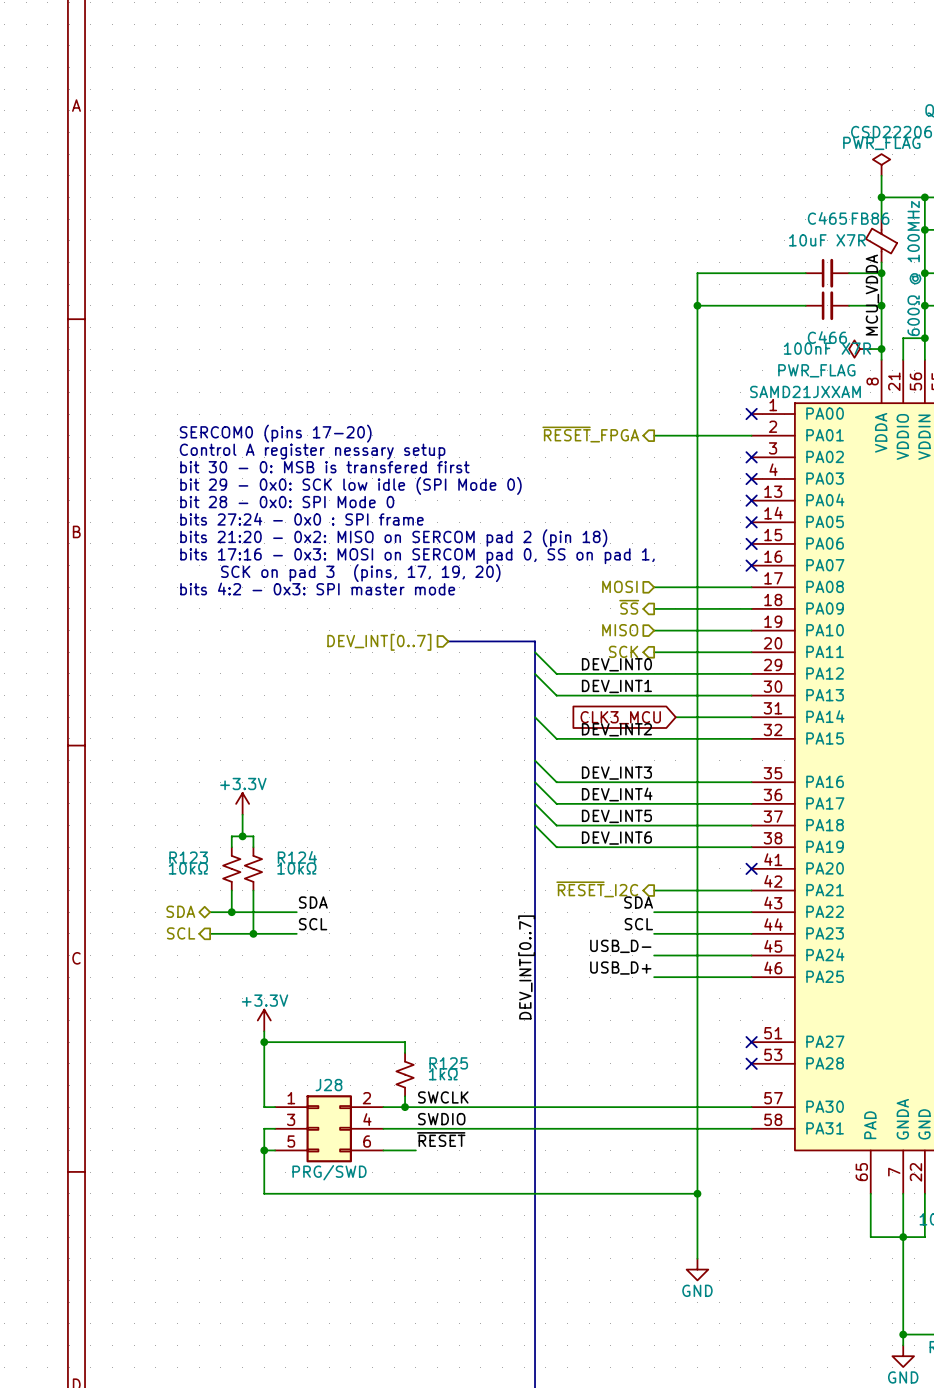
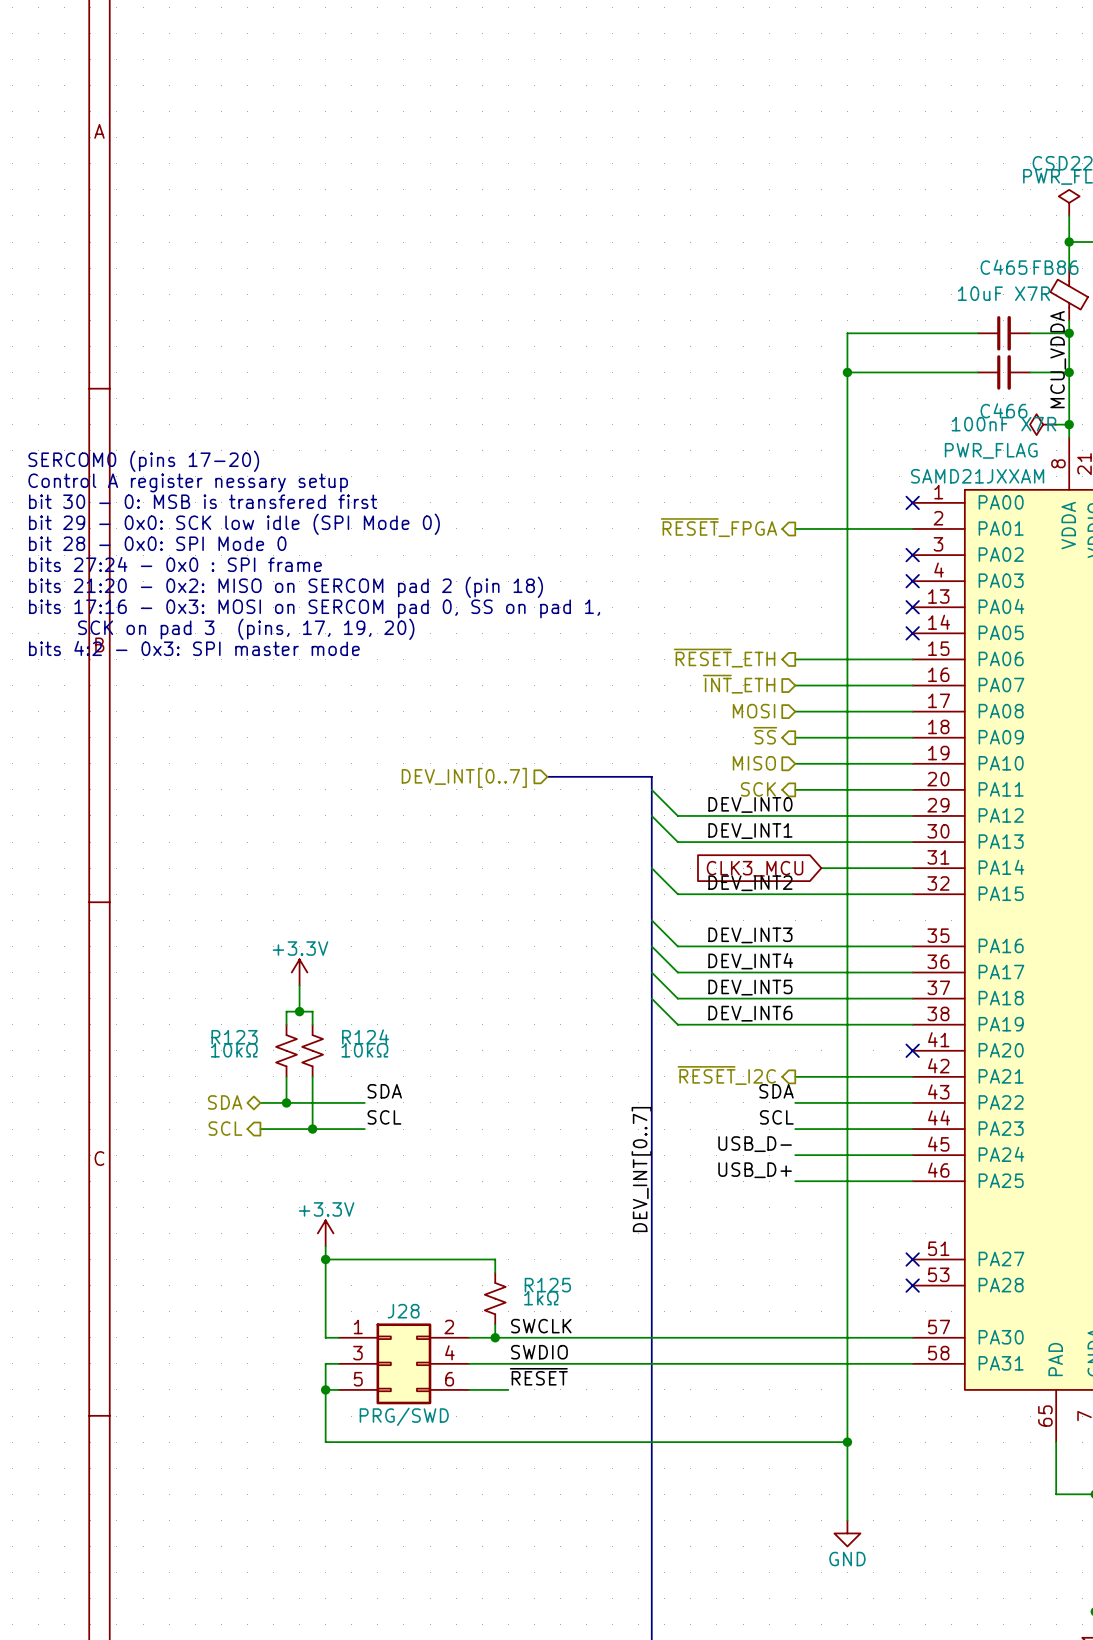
text position: SERCOM0 (pins 17-20) (275, 433) -> SERCOM0 (pins 17-20) (143, 461)
text position: Control A register nessary setup (312, 451) -> Control A register nessary setup (188, 482)
text position: bit 30 - 0: MSB is transfered first (324, 467) -> bit 30 - 0: MSB is transfered first (203, 501)
text position: bit 29 - 0x0: SCK low idle (SPI Mode 0) (350, 485) -> bit 29 - 0x0: SCK low idle (SPI Mode 0) (234, 524)
text position: bit 28 - 0x0: SPI Mode 0 (287, 502) -> bit 28 - 0x0: SPI Mode 0 (157, 543)
text position: bits 27:24 - 0x0 : SPI frame (301, 519) -> bits 27:24 - 0x0 : SPI frame (175, 564)
text position: bits 21:20 - 0x2: MISO on SERCOM pad 2 (pin 18) (393, 538) -> bits 21:20 - 0x2: MISO on SERCOM pad 2 (pin 18) (285, 587)
hierarchical label: none -> ~{RESET}_ETH (724, 658)
wire: none -> (795, 659) (912, 659)
no-connect mark: (751, 543) -> none
text position: bits 17:16 - 0x3: MOSI on SERCOM pad 0, SS on pad 1, (417, 556) -> bits 17:16 - 0x3: MOSI on SERCOM pad 0, SS on pad 1, (314, 608)
hierarchical label: none -> ~{INT}_ETH (739, 684)
wire: none -> (795, 685) (912, 685)
no-connect mark: (751, 565) -> none
text position: SCK on pad 3 (pins, 17, 19, 20) (360, 573) -> SCK on pad 3 (pins, 17, 19, 20) (246, 629)
text position: bits 4:2 - 0x3: SPI master mode (317, 588) -> bits 4:2 - 0x3: SPI master mode (194, 648)

